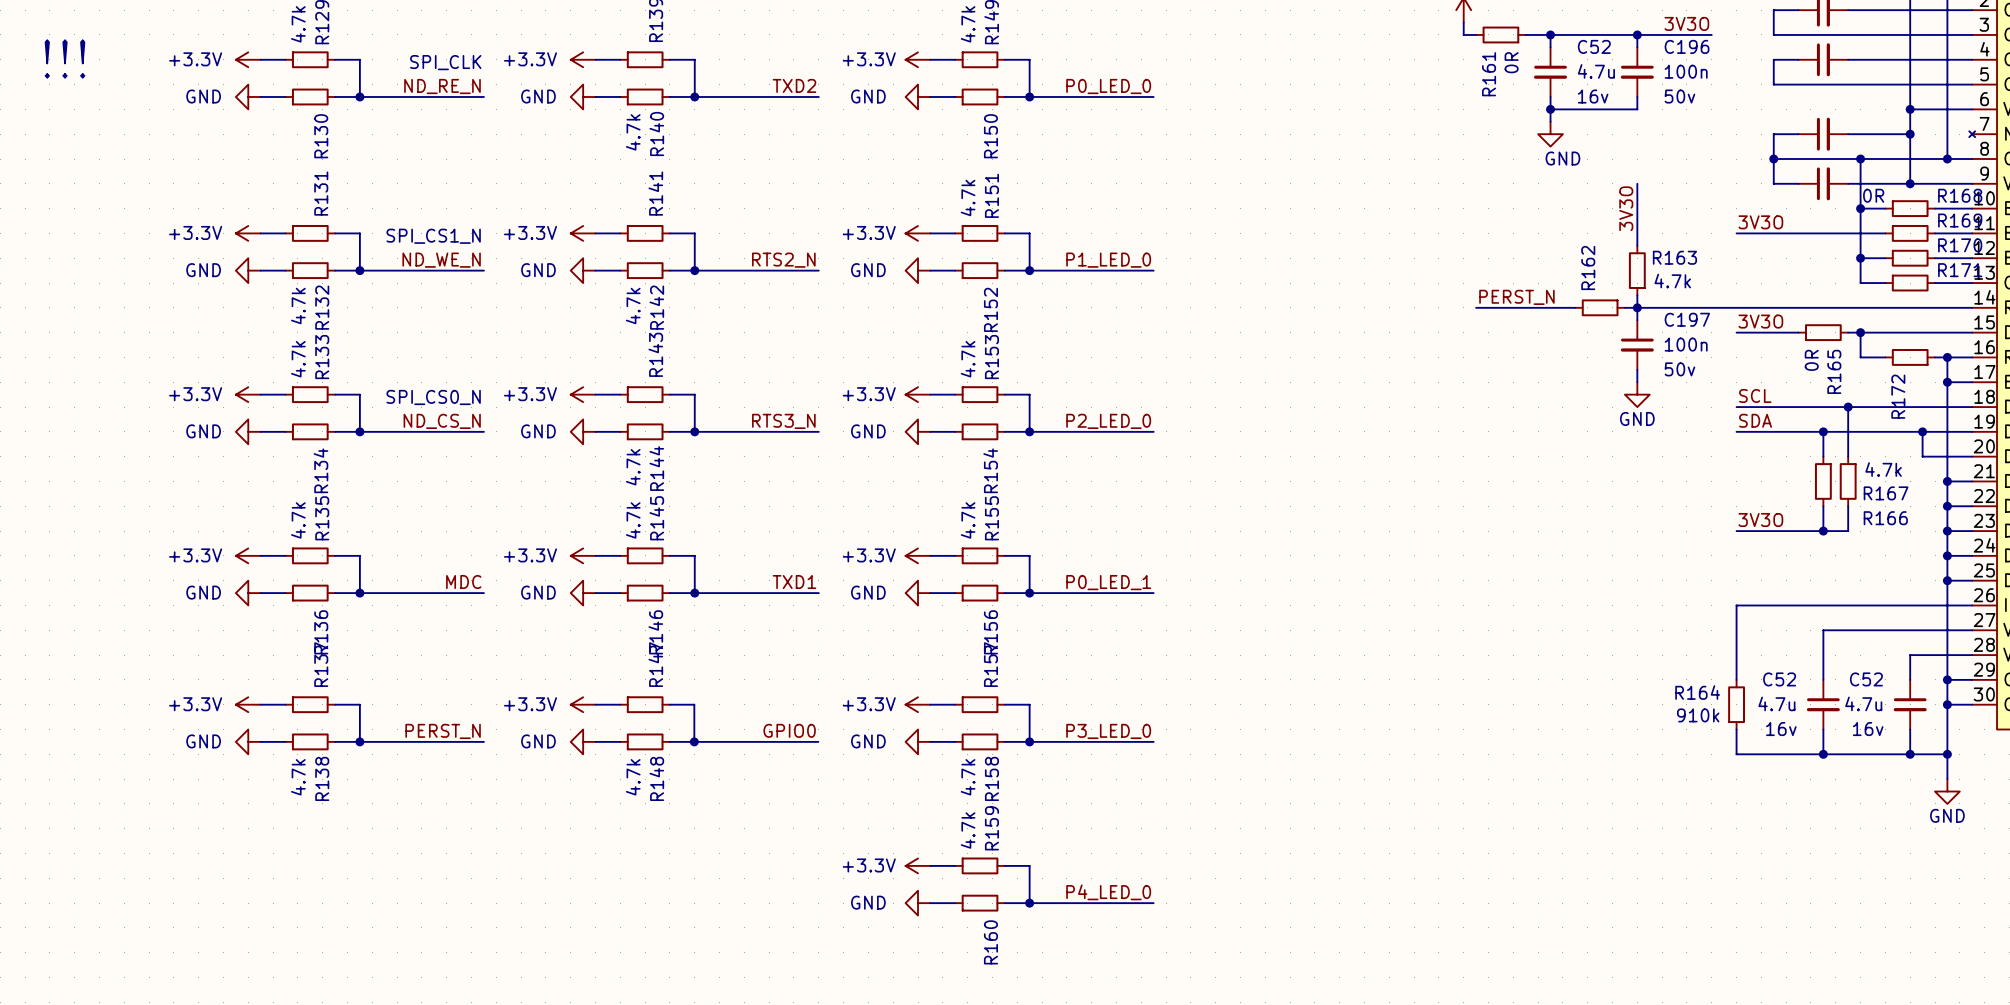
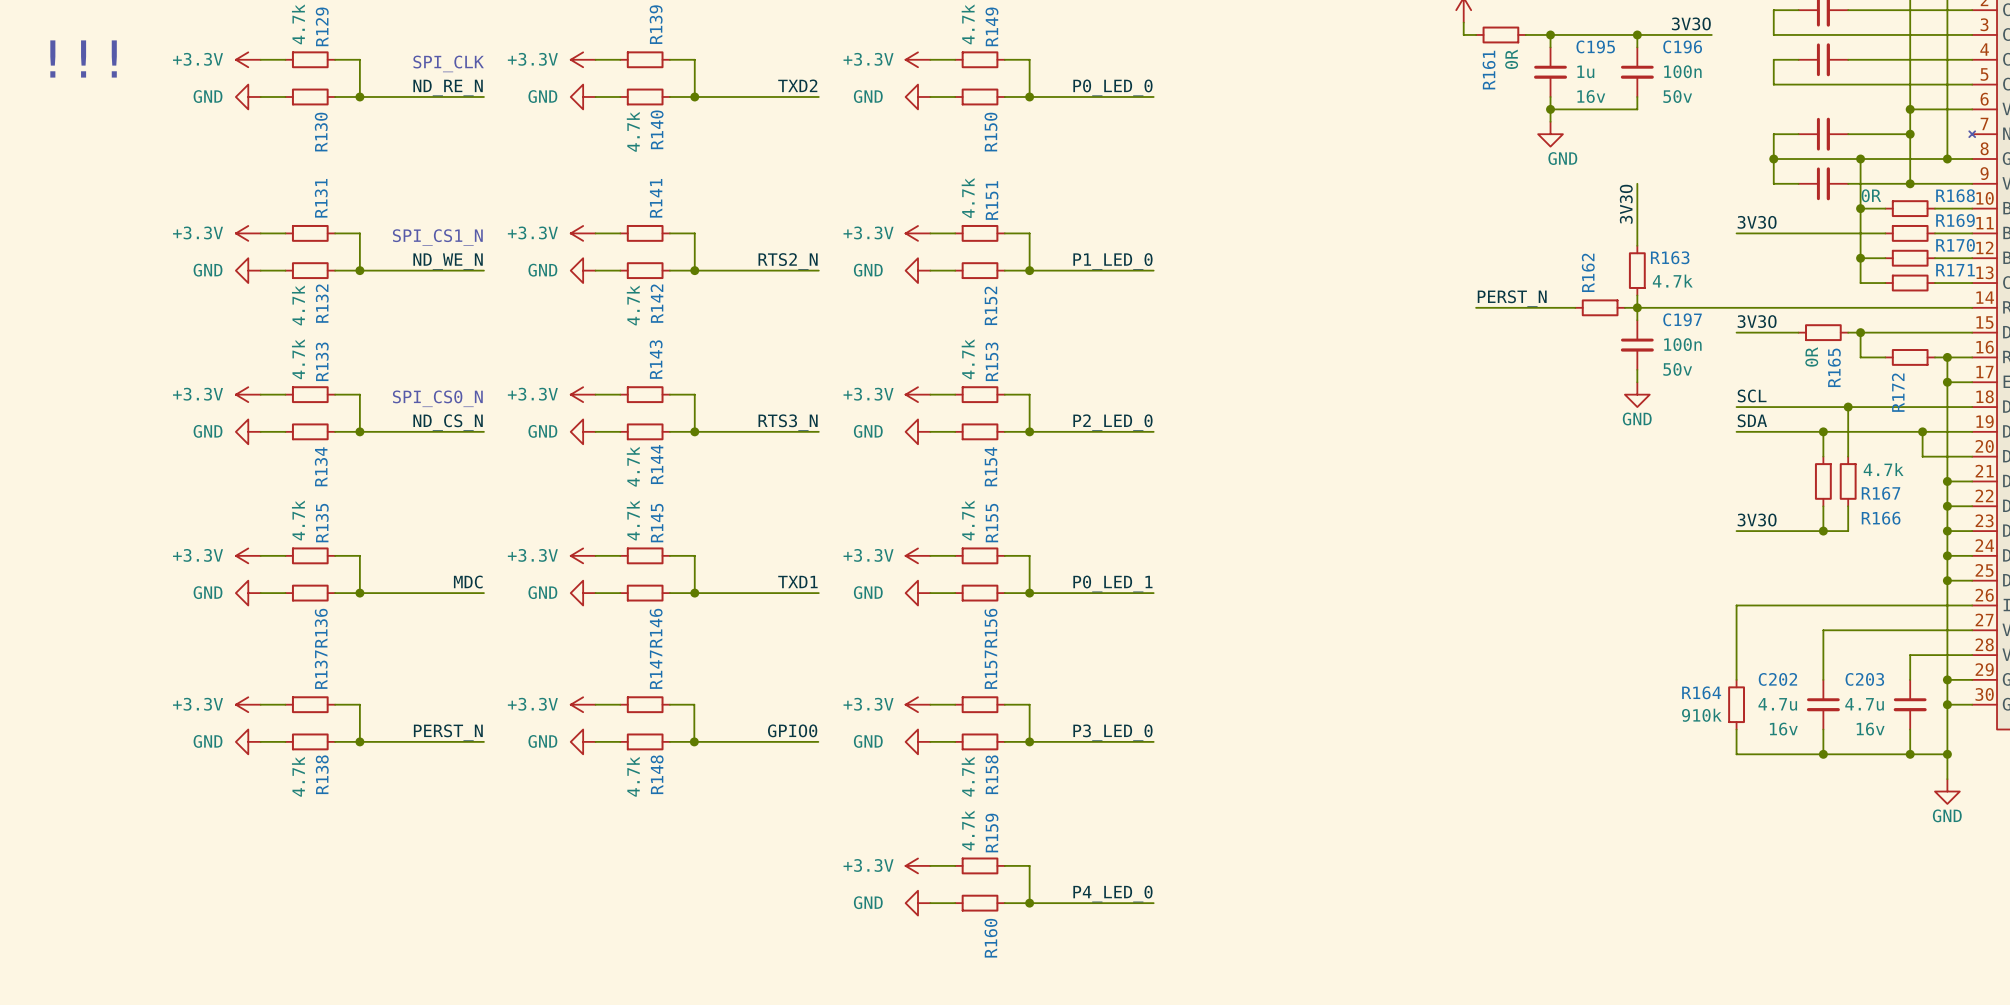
C52 name: C52 (1594, 46) -> C195 (1595, 46)
C52 value: 4.7u (1596, 71) -> 1u (1585, 71)
C52 name: C52 (1779, 679) -> C202 (1777, 679)
C52 name: C52 (1866, 679) -> C203 (1864, 679)

